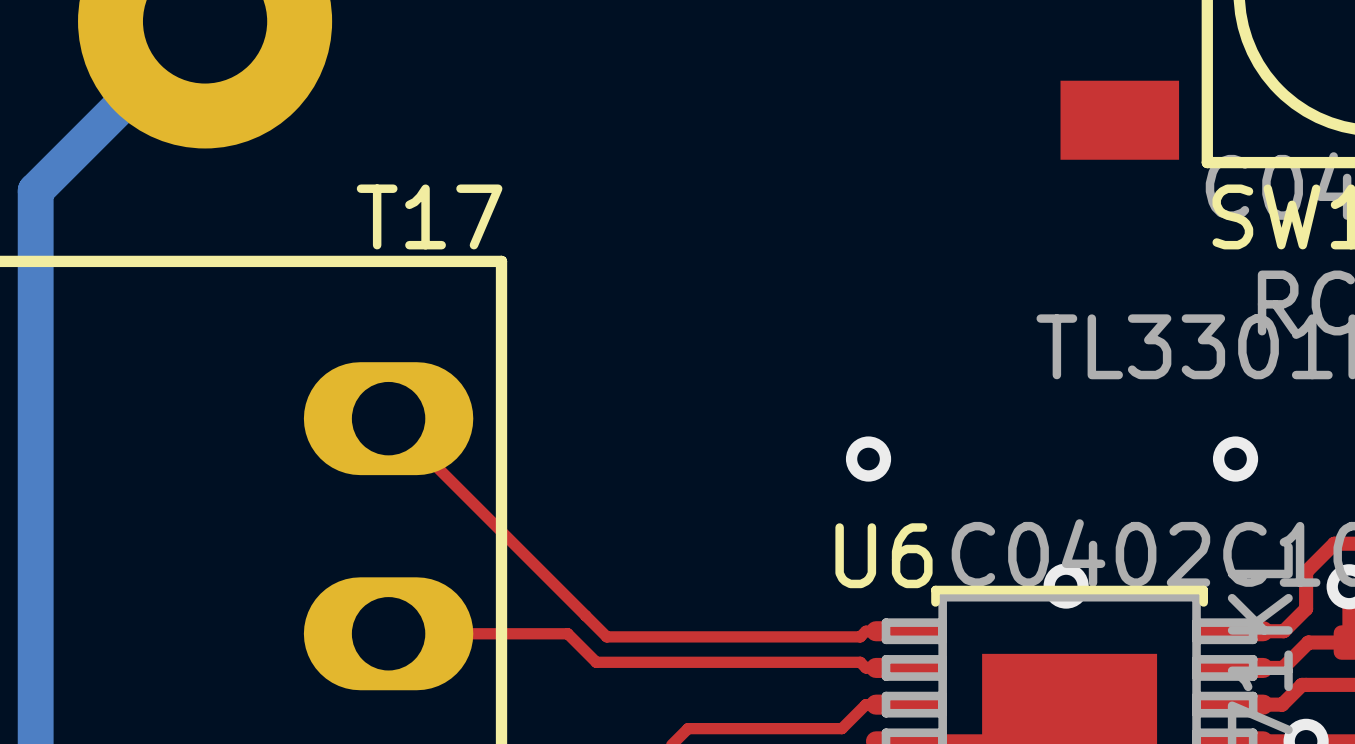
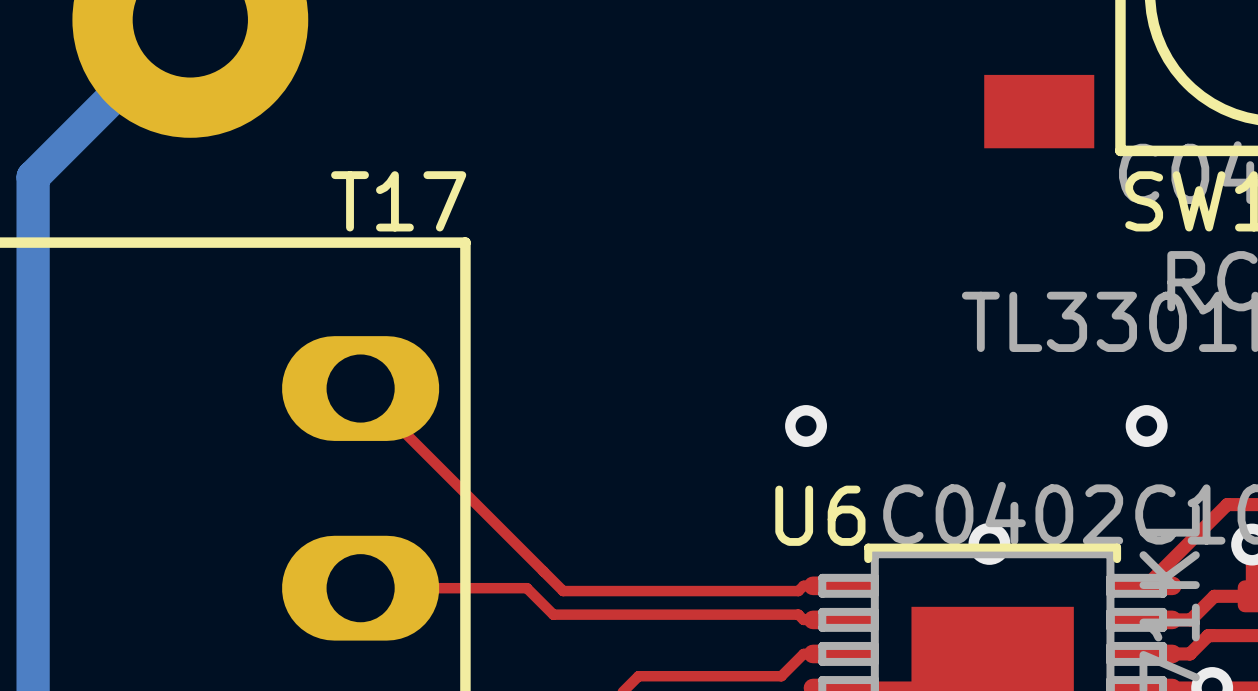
top track: (1334, 543) (1306, 571) (1306, 608) (1283, 631) (1234, 631) -> (1238, 504) (1227, 504) (1146, 585)

